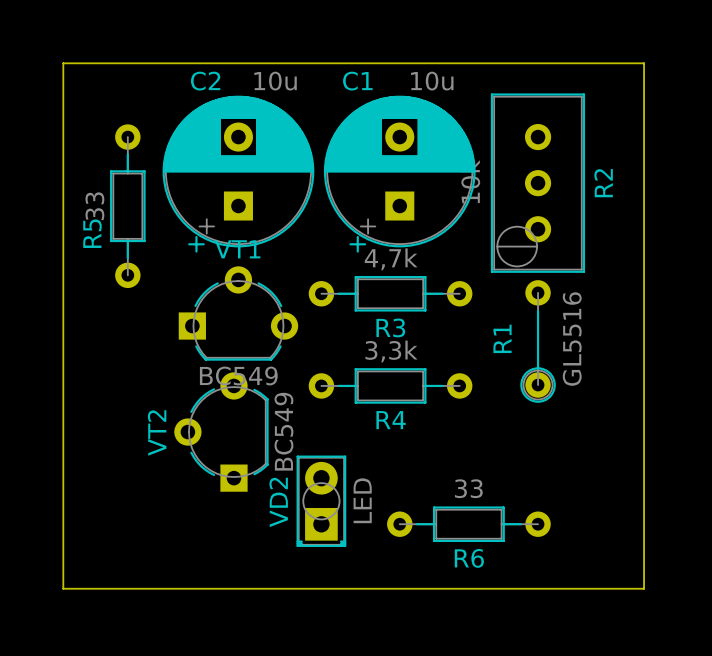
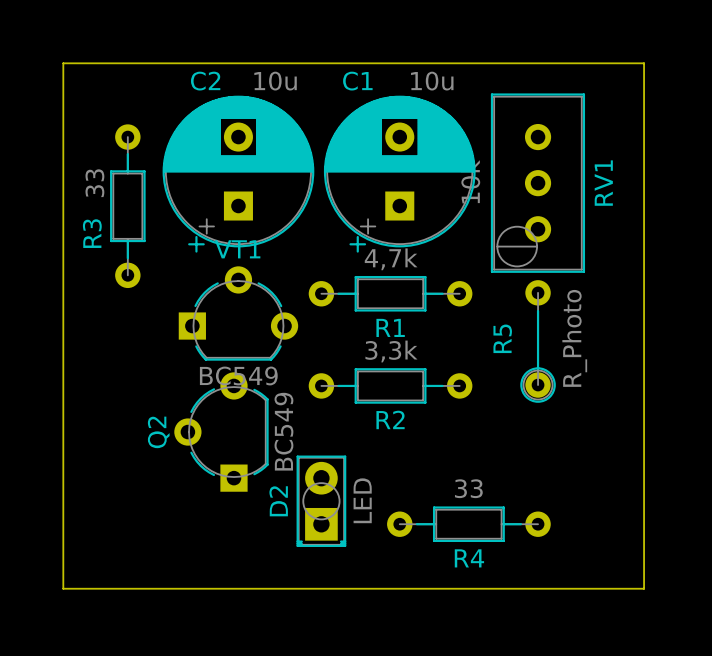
R2 name: R2 (603, 183) -> RV1 (603, 183)
R5 value position: 33 (94, 206) -> 33 (94, 183)
R5 name: R5 (92, 233) -> R3 (92, 233)
R3 name: R3 (390, 327) -> R1 (390, 327)
R1 name: R1 (502, 338) -> R5 (502, 338)
R1 value: GL5516 (572, 339) -> R_Photo (574, 338)
R4 name: R4 (391, 420) -> R2 (390, 419)
VT2 name: VT2 (157, 433) -> Q2 (158, 432)
VD2 name: VD2 (278, 502) -> D2 (278, 501)
R6 name: R6 (469, 558) -> R4 (469, 558)

